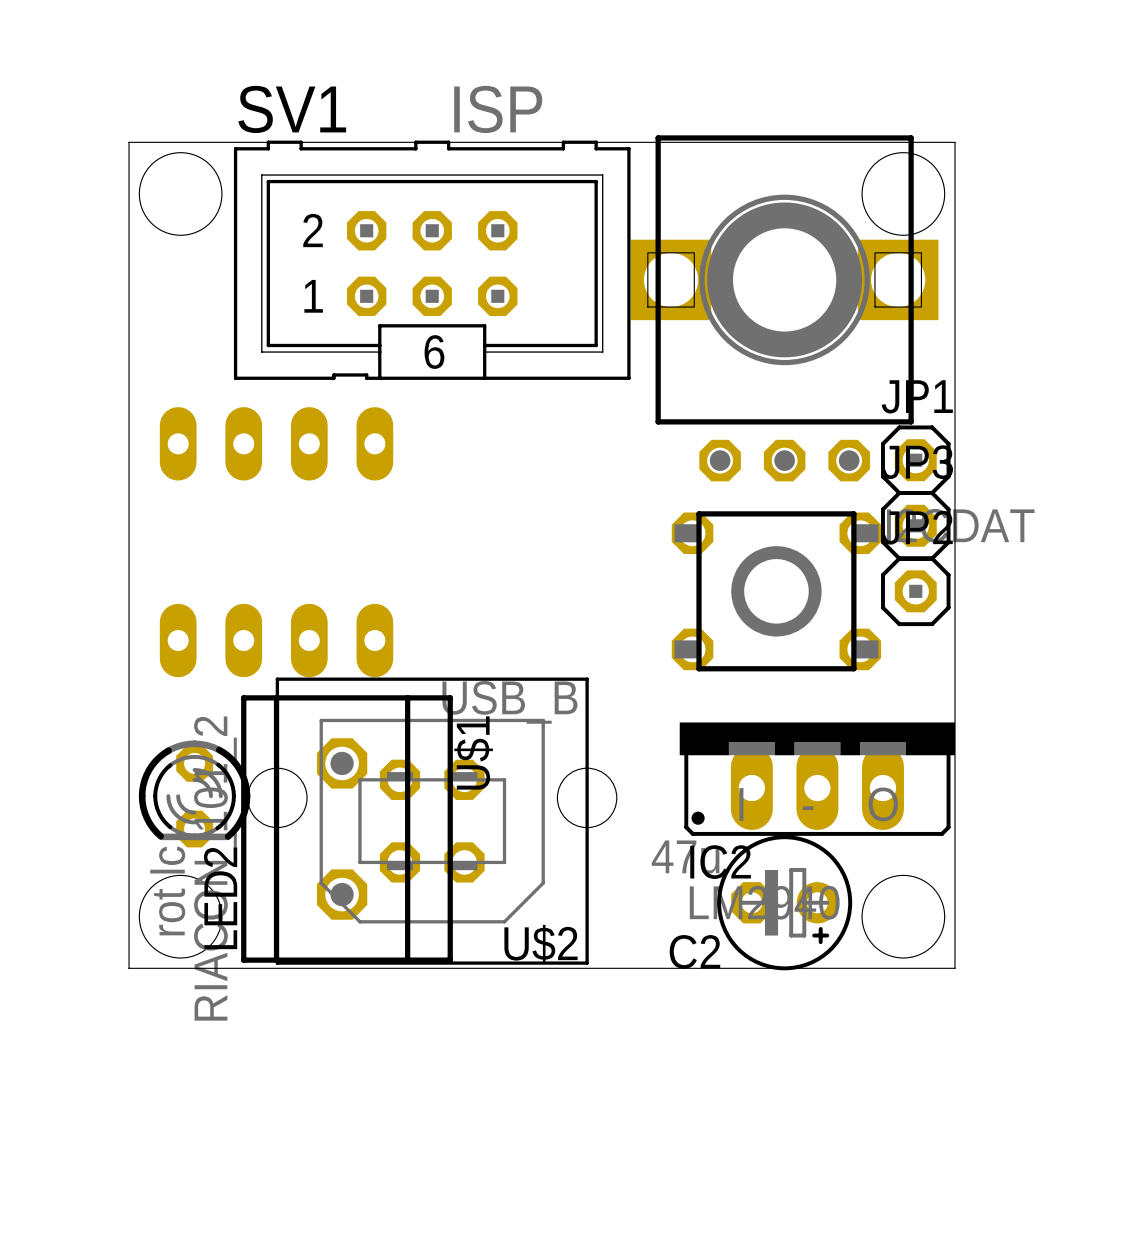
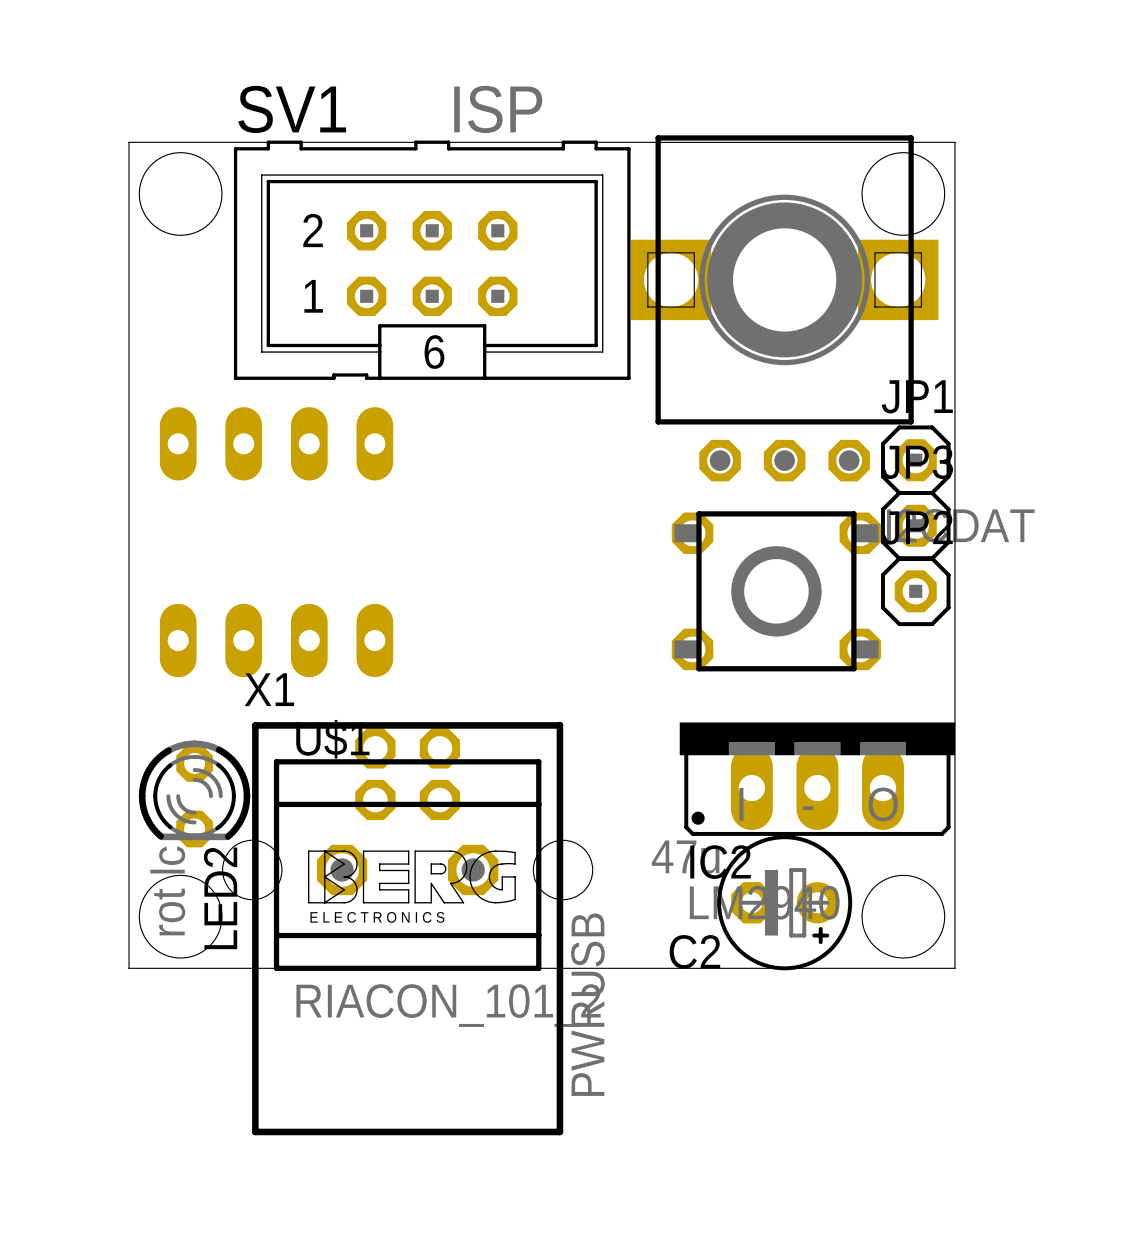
U$2: USB_B (432, 821) -> none
U$1 rotation: 0° (346, 829) -> 90° counterclockwise (407, 865)
X1: none -> PWRUSB (407, 928)

